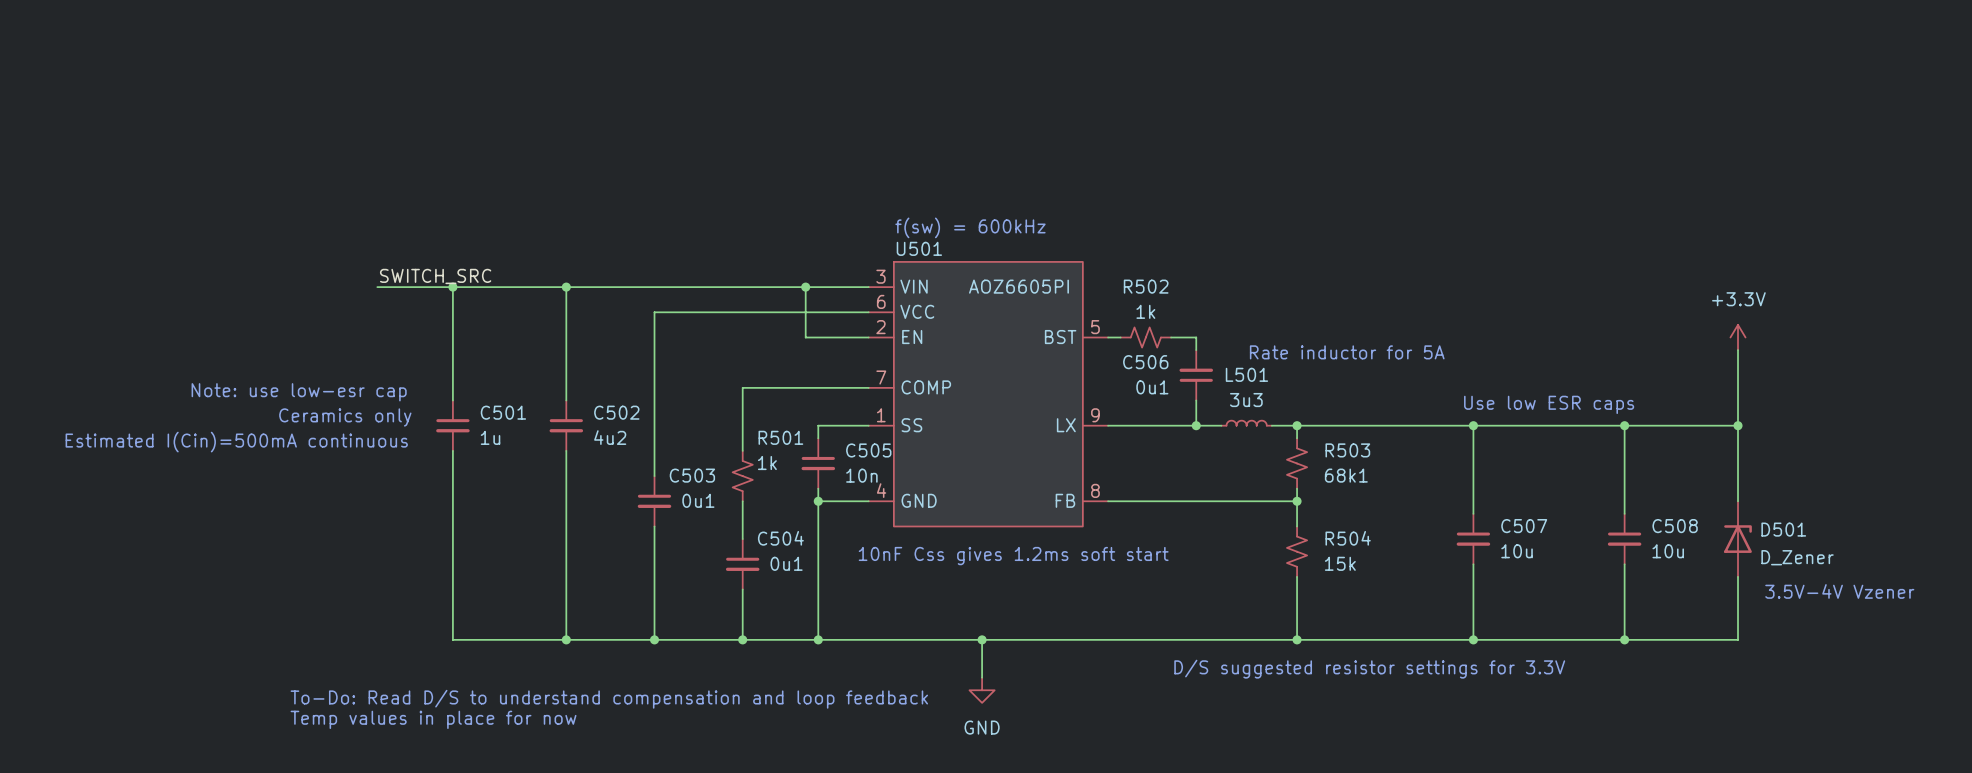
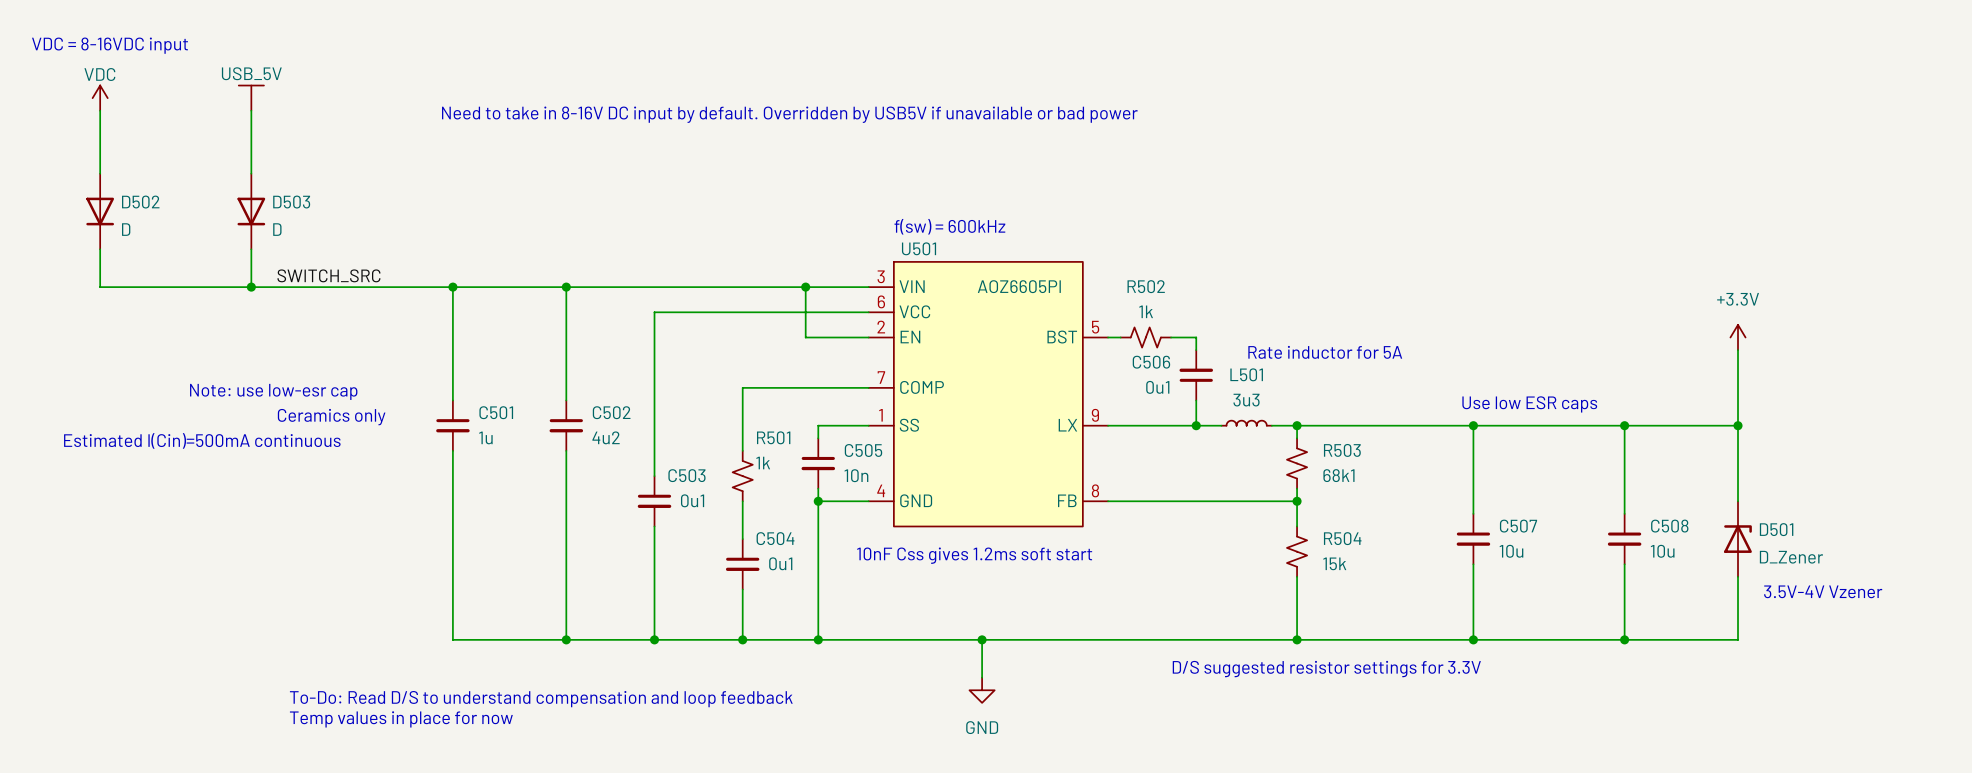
text: none -> VDC = 8-16VDC input (110, 45)
power symbol: none -> USB_5V (251, 97)
power symbol: none -> VDC (100, 98)
wire: none -> (100, 110) (100, 173)
wire: none -> (251, 110) (251, 173)
text: none -> Need to take in 8-16V DC input by default. Overridden by USB5V if unavailable or bad power (789, 114)
D502: none -> D (100, 211)
D503: none -> D (251, 211)
wire: none -> (100, 249) (100, 287) (377, 287)
wire: none -> (251, 249) (251, 287)
label position: SWITCH_SRC (435, 276) -> SWITCH_SRC (328, 275)
junction: none -> (251, 287)

